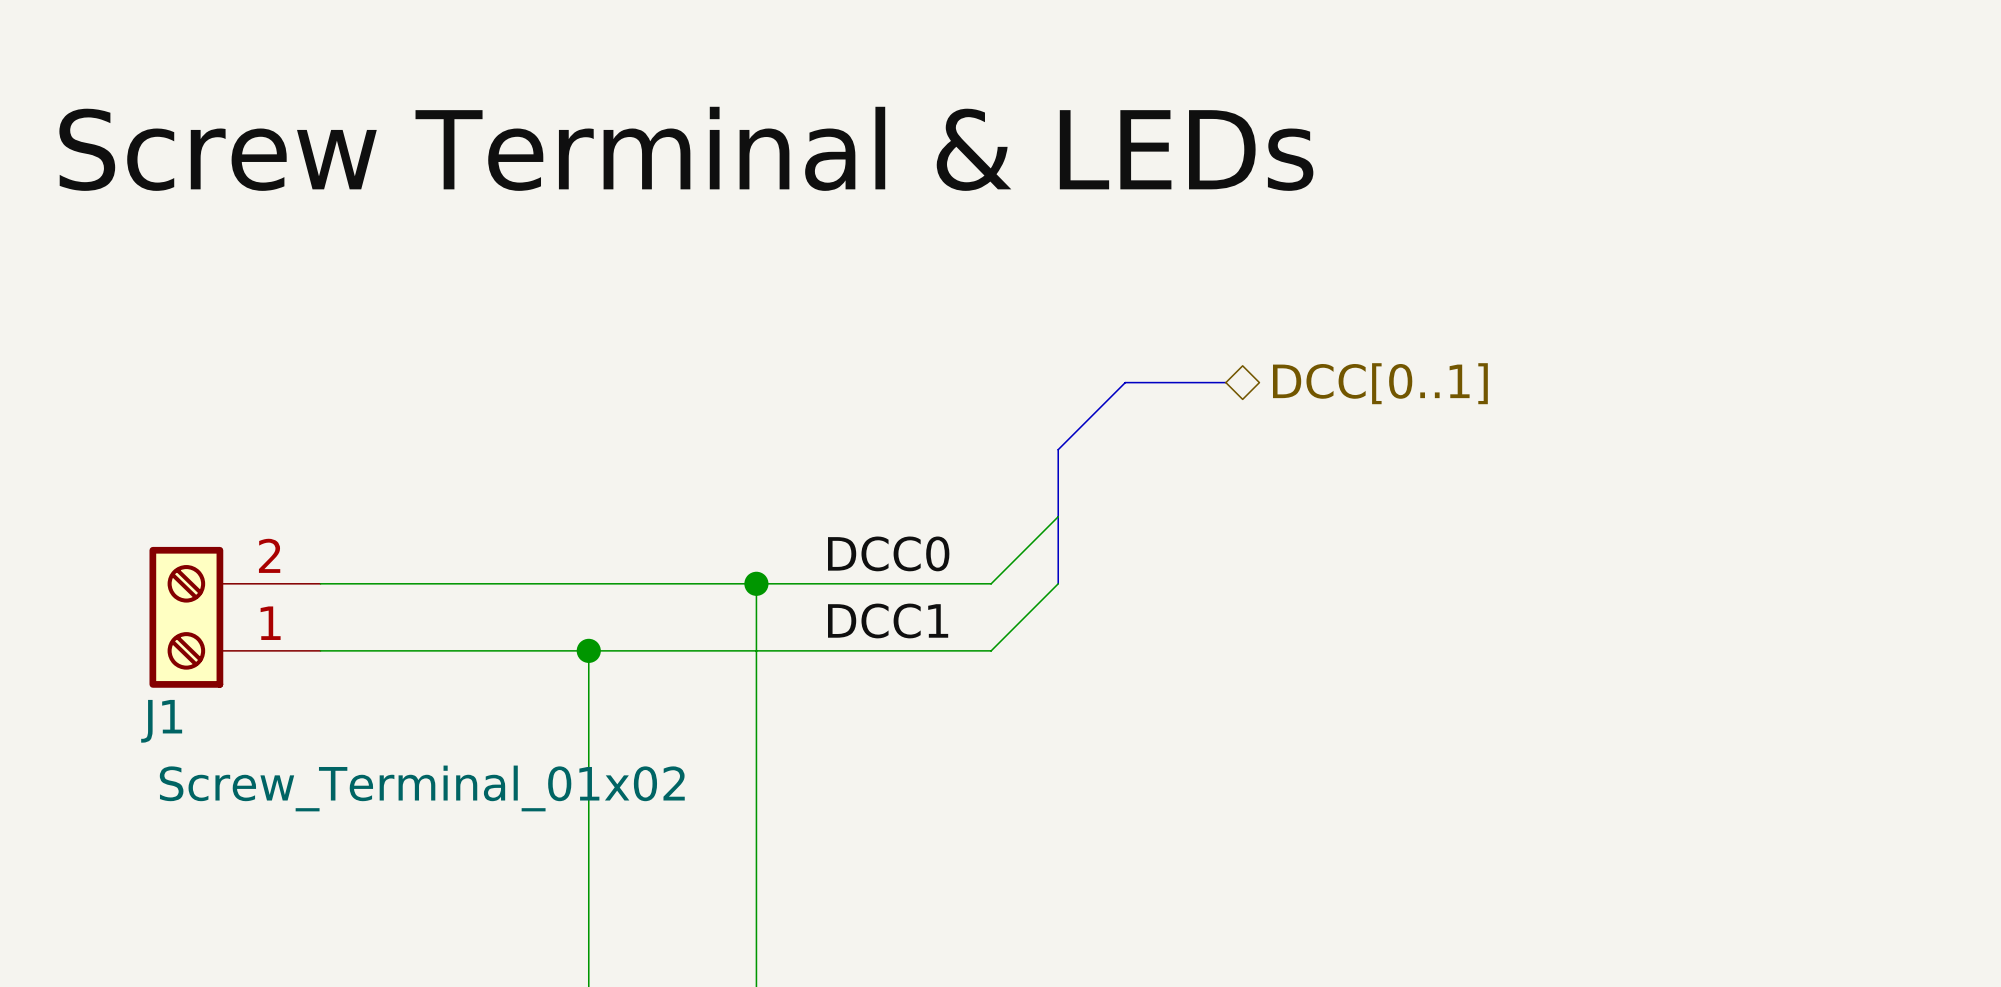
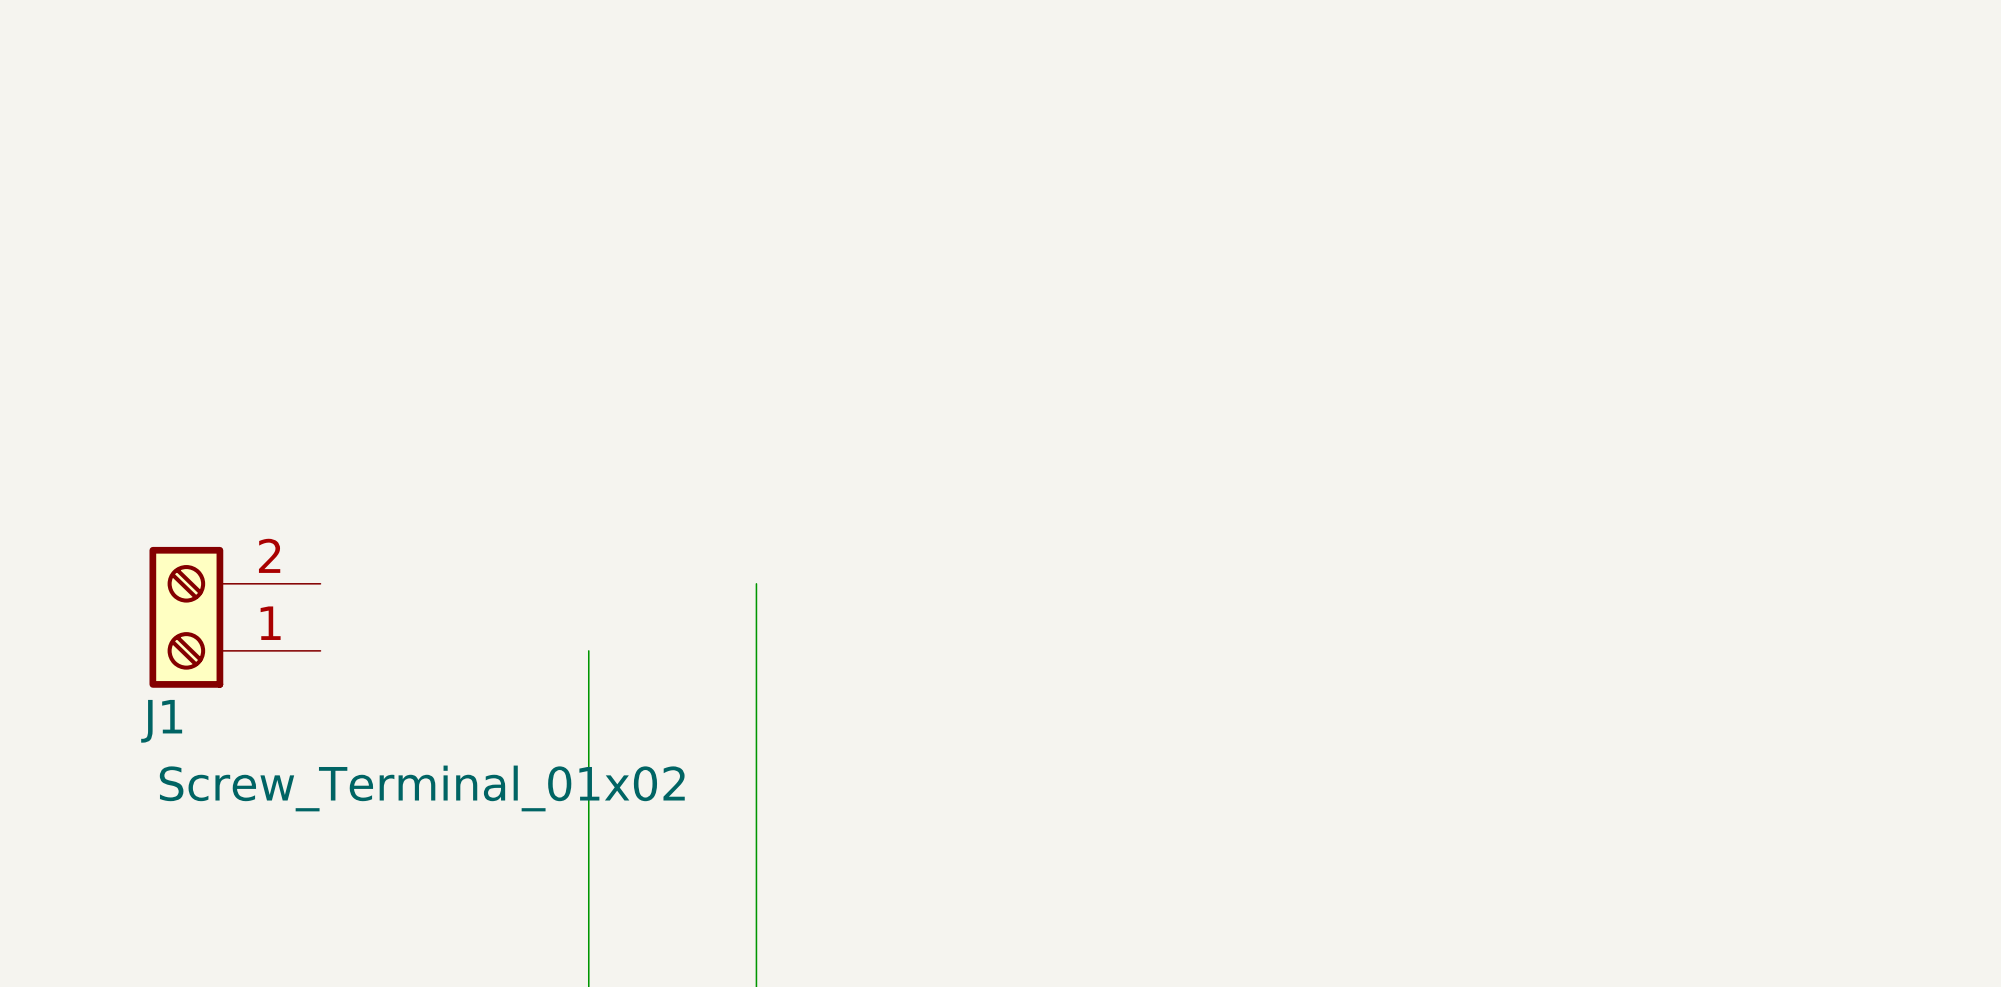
label: Screw Terminal & LEDs (686, 148) -> none
bus: (1225, 382) (1125, 382) (1058, 449) (1058, 583) -> none
hierarchical label: DCC[0..1] (1380, 383) -> none
wire: (1058, 516) (991, 583) (320, 583) -> none
label: DCC0 (888, 553) -> none
junction: (756, 583) -> none
wire: (1058, 583) (991, 650) (320, 650) -> none
label: DCC1 (888, 620) -> none
junction: (588, 650) -> none

